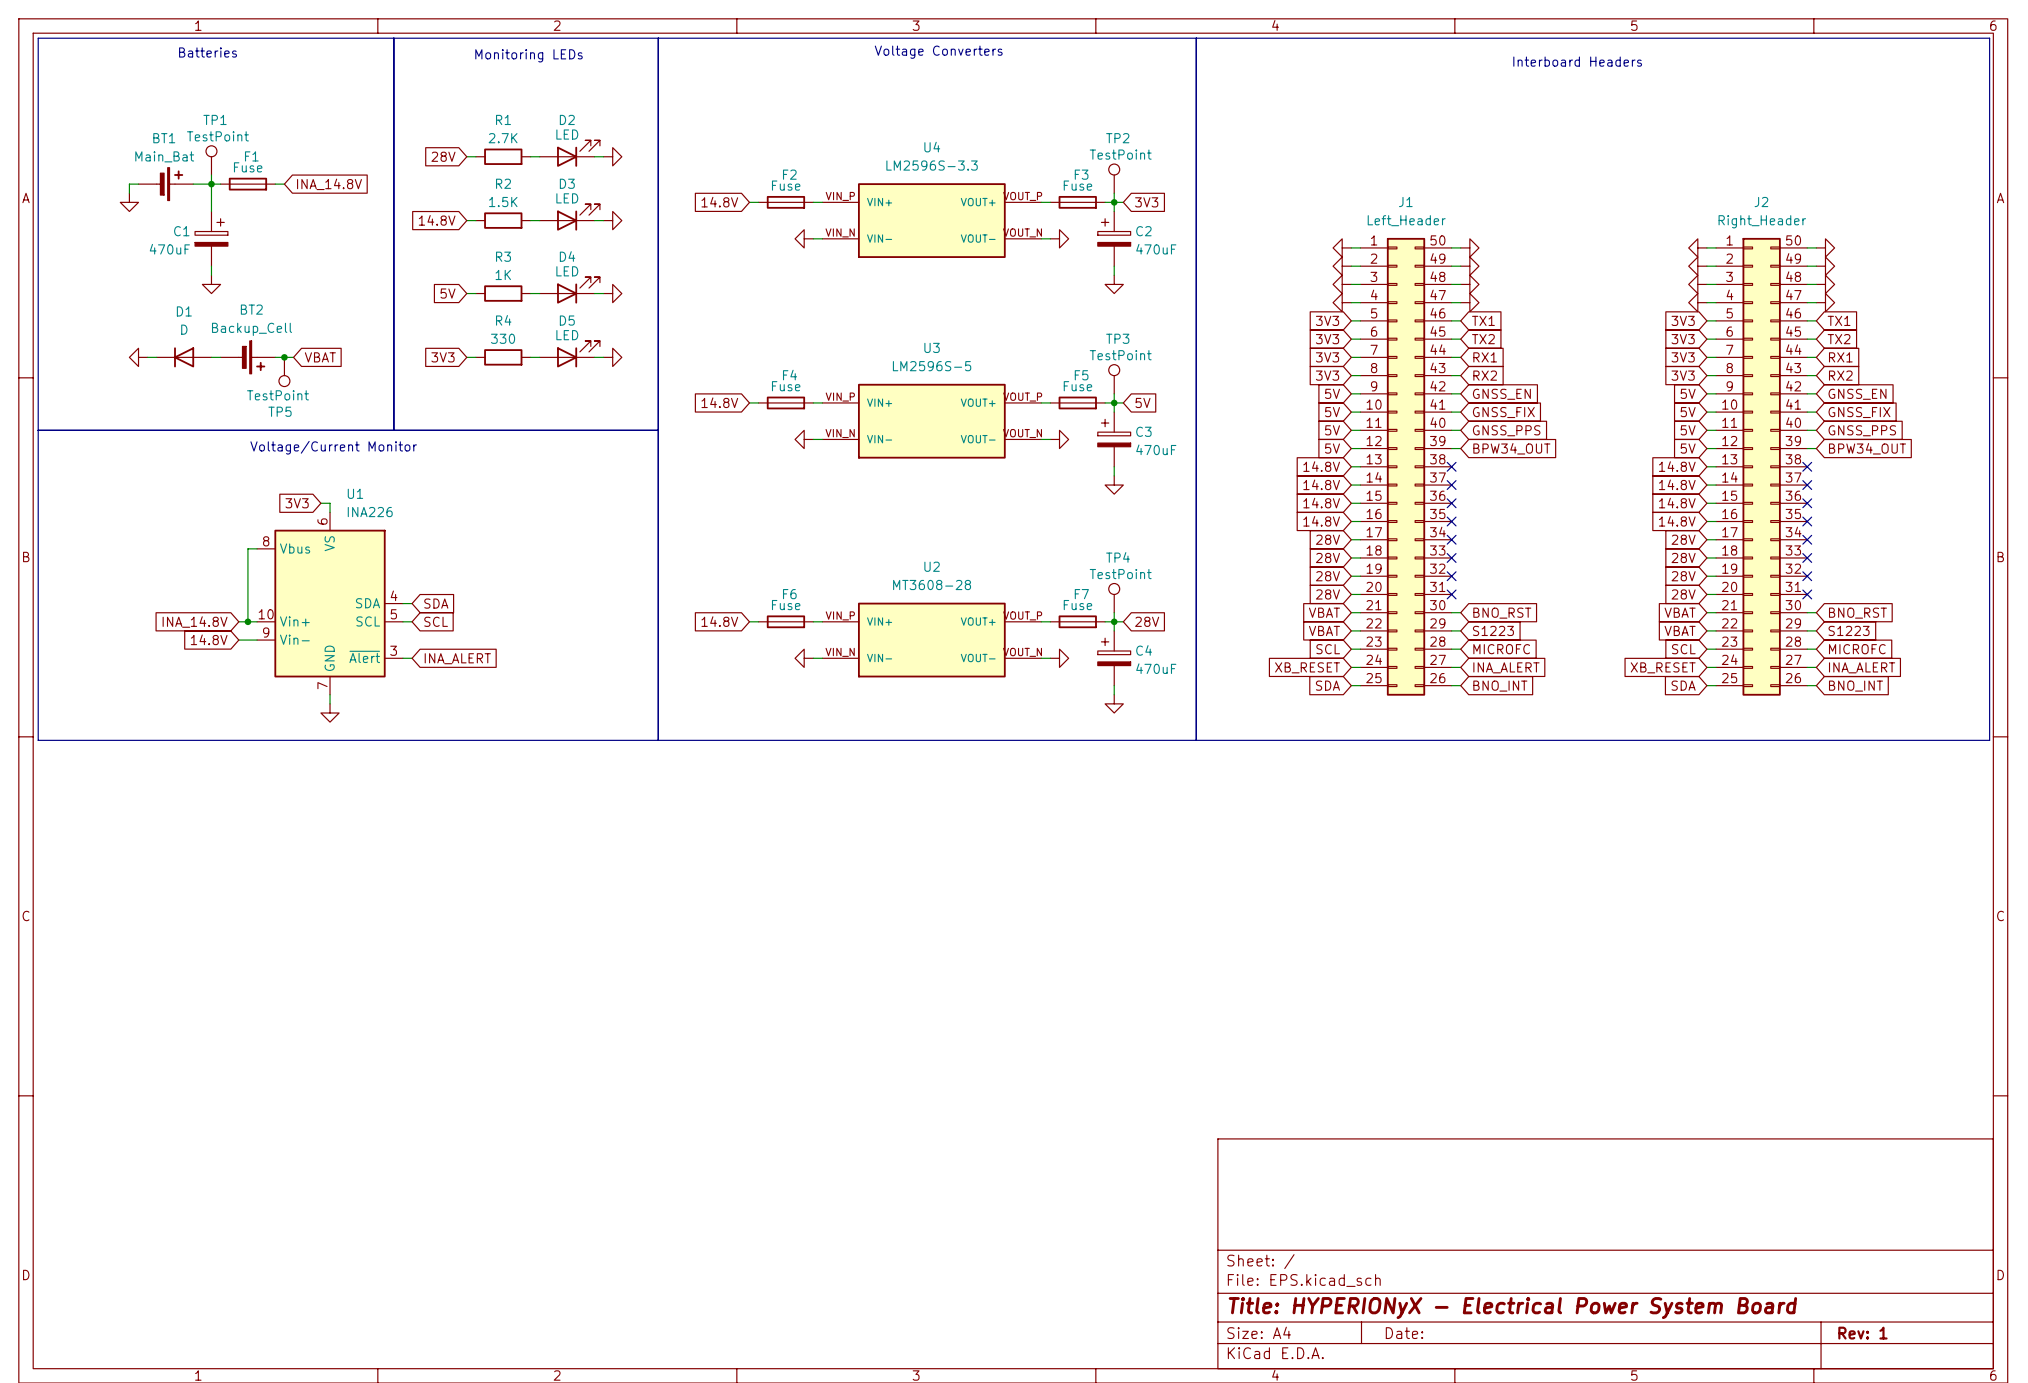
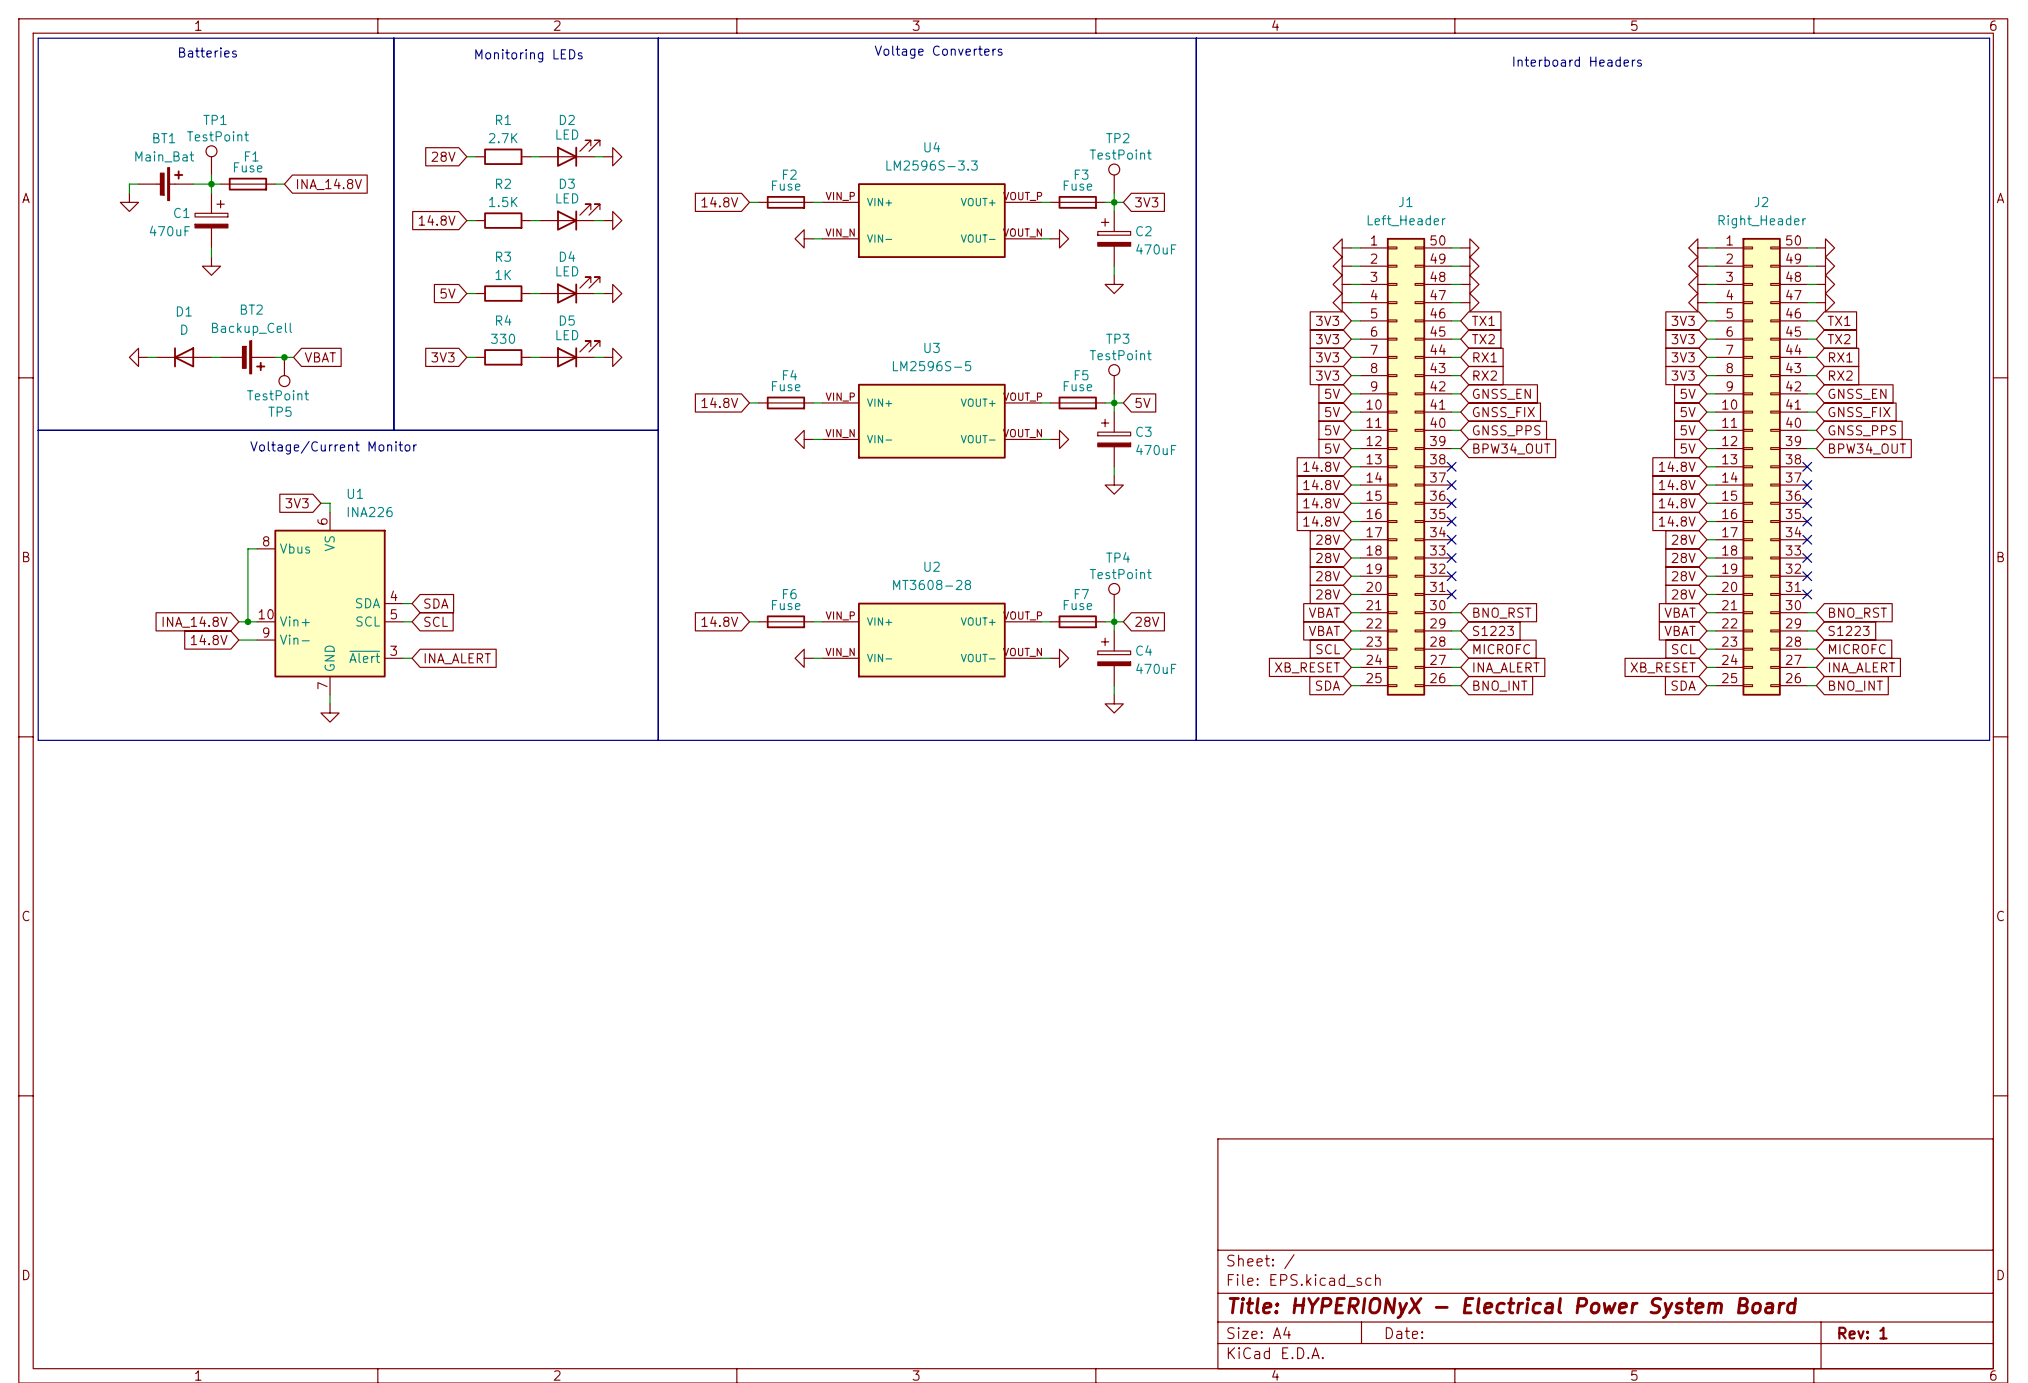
C1 position: (211, 238) -> (211, 220)
power symbol position: (211, 284) -> (211, 266)

